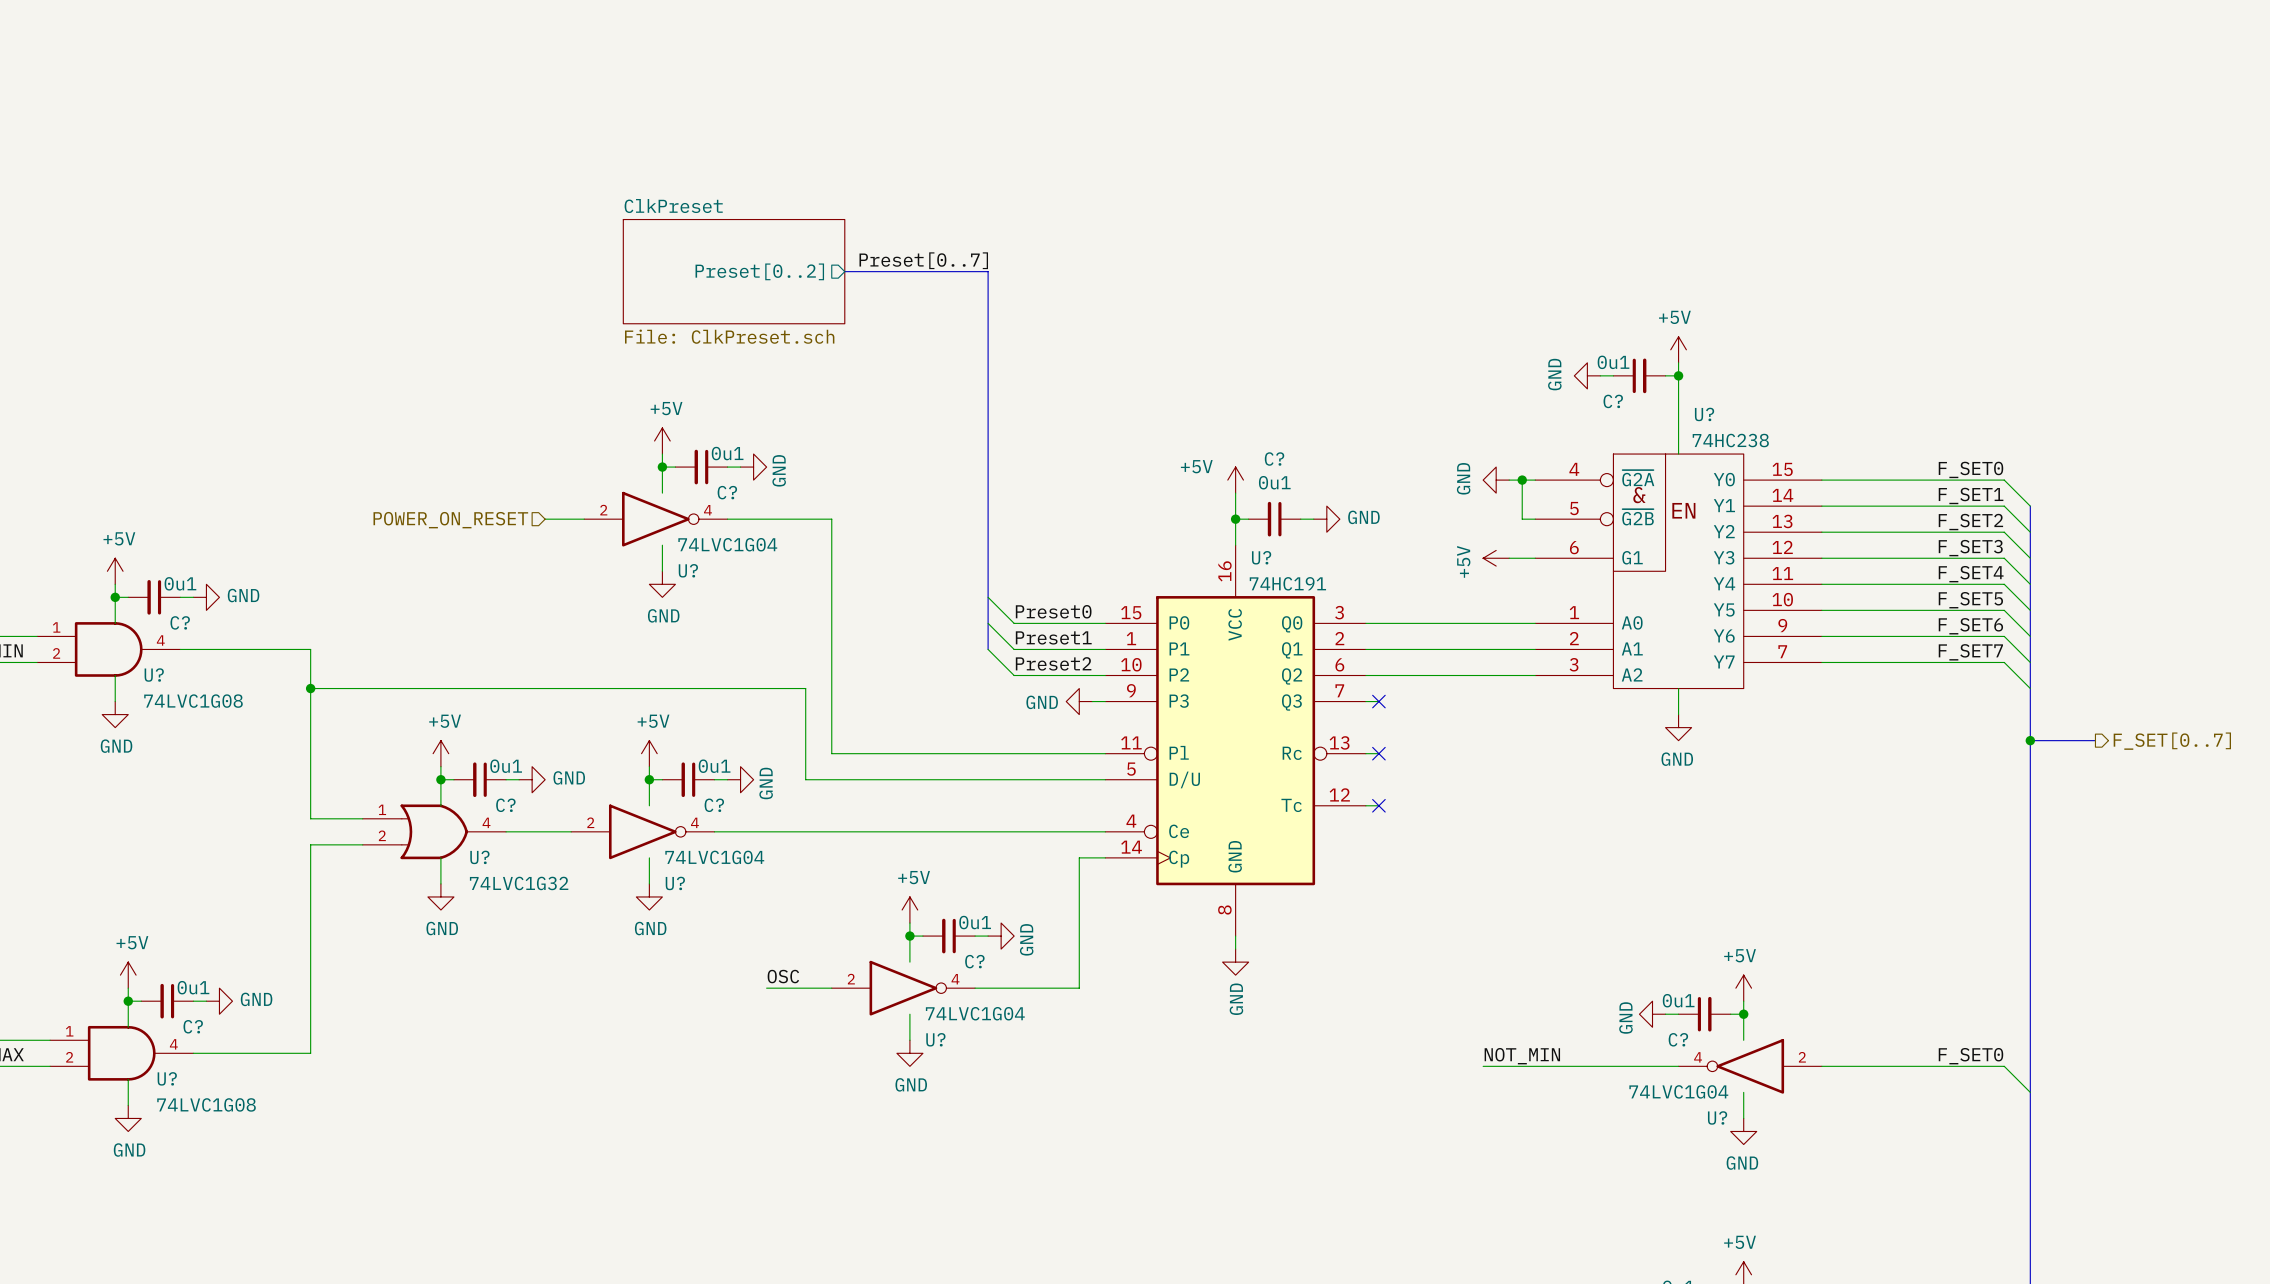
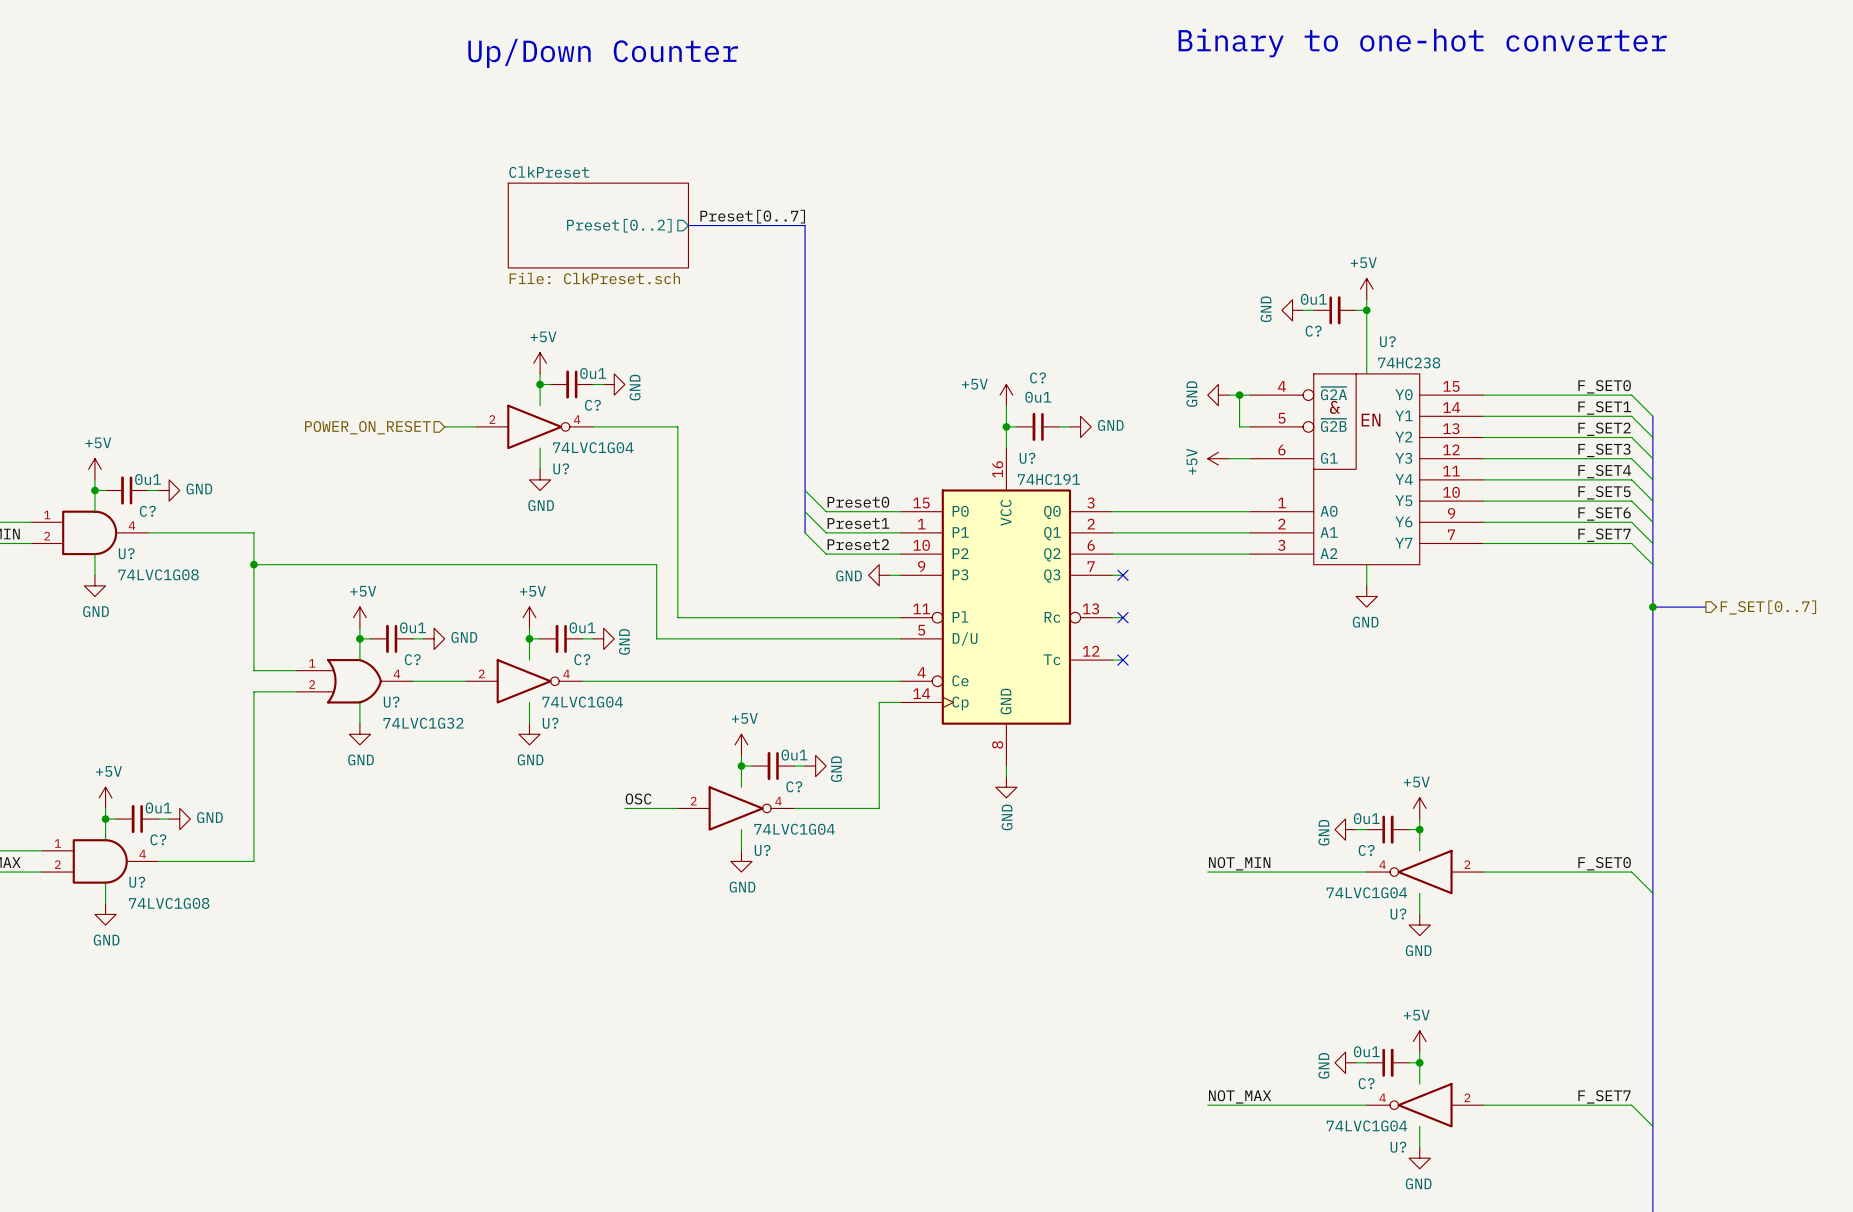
text: none -> Binary to one-hot converter (1422, 42)
text: none -> Up/Down Counter (603, 53)

